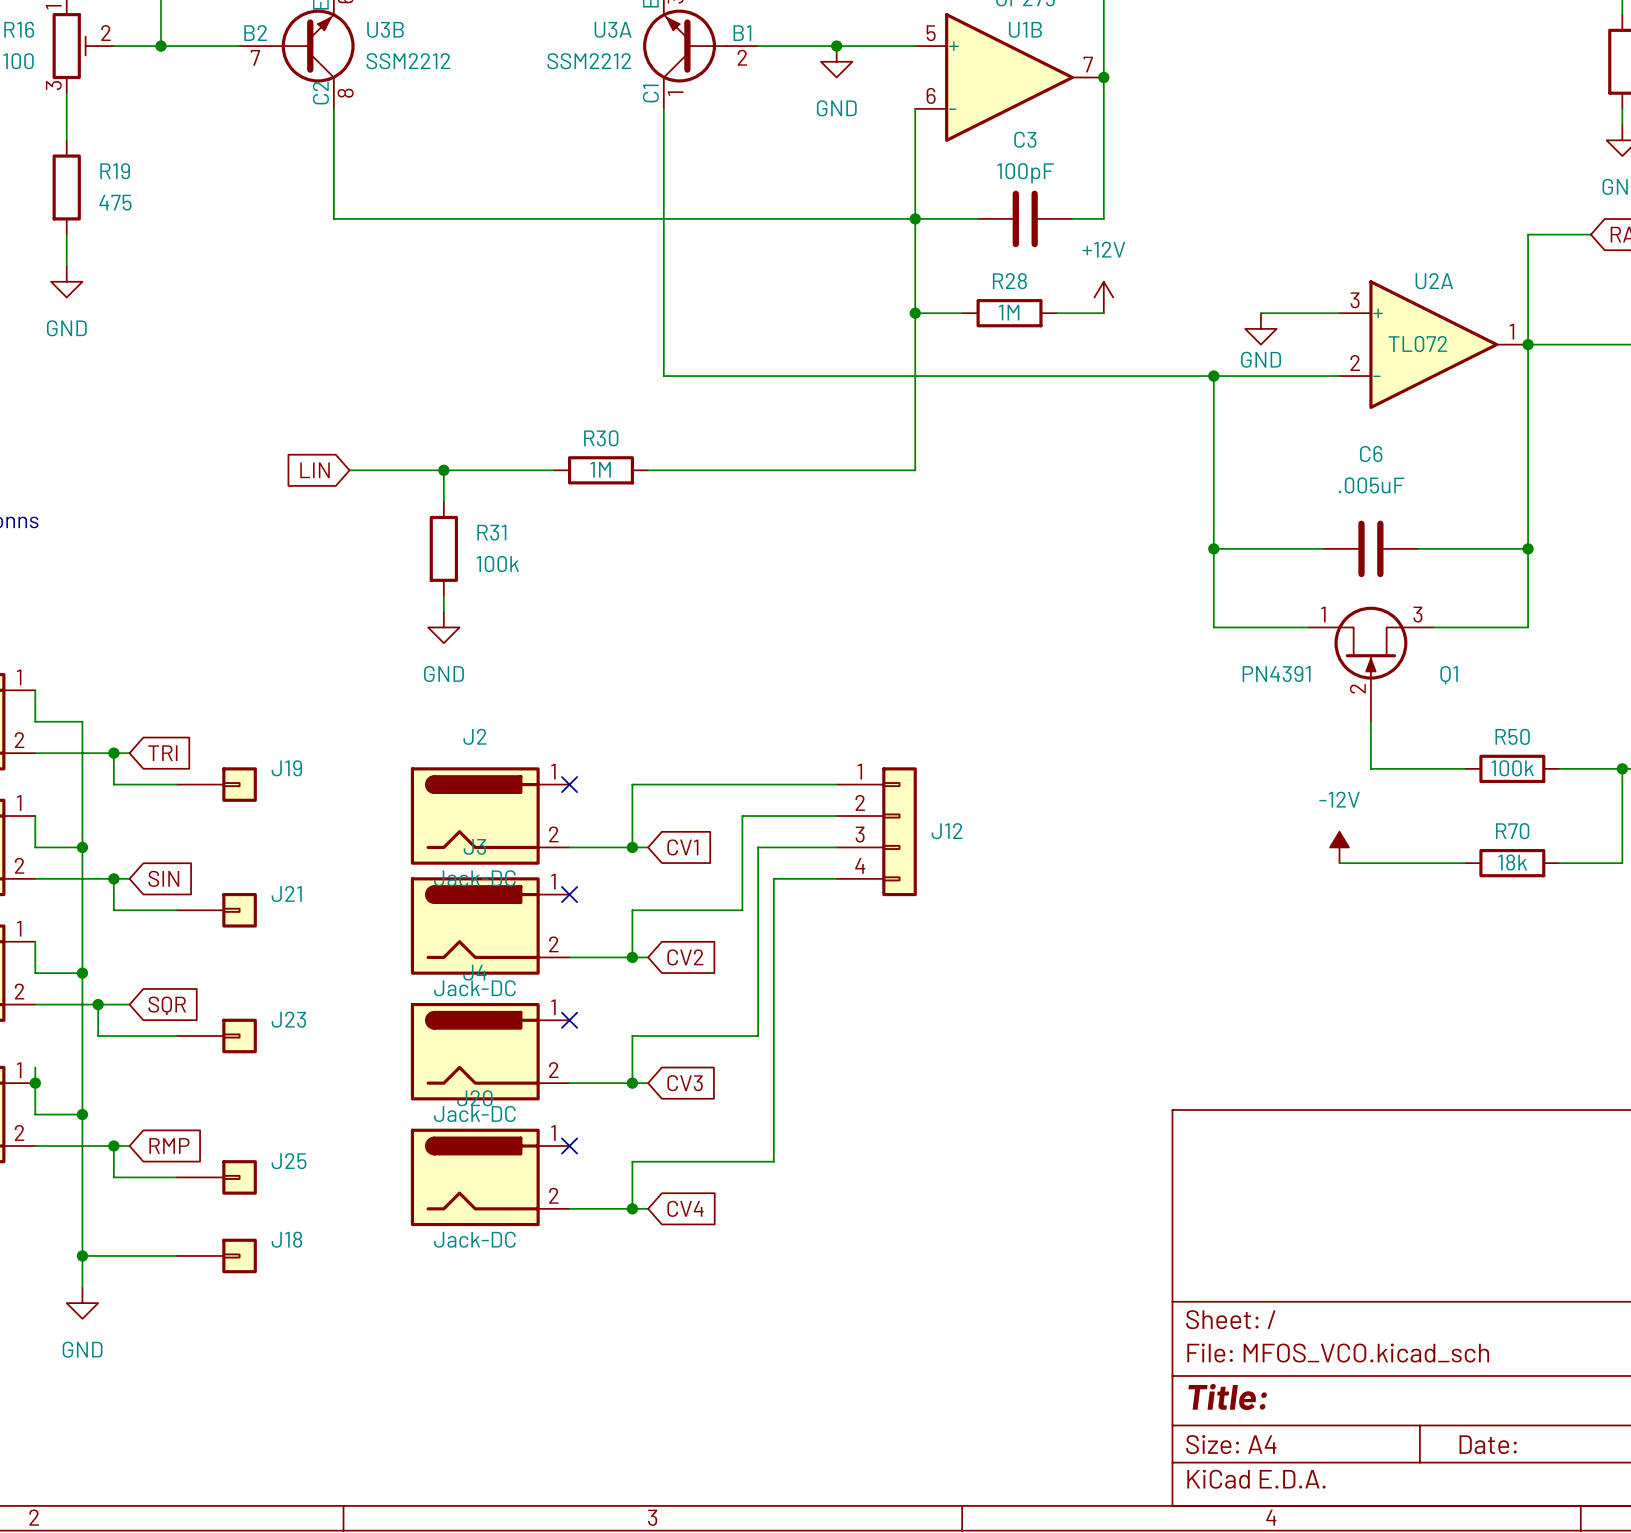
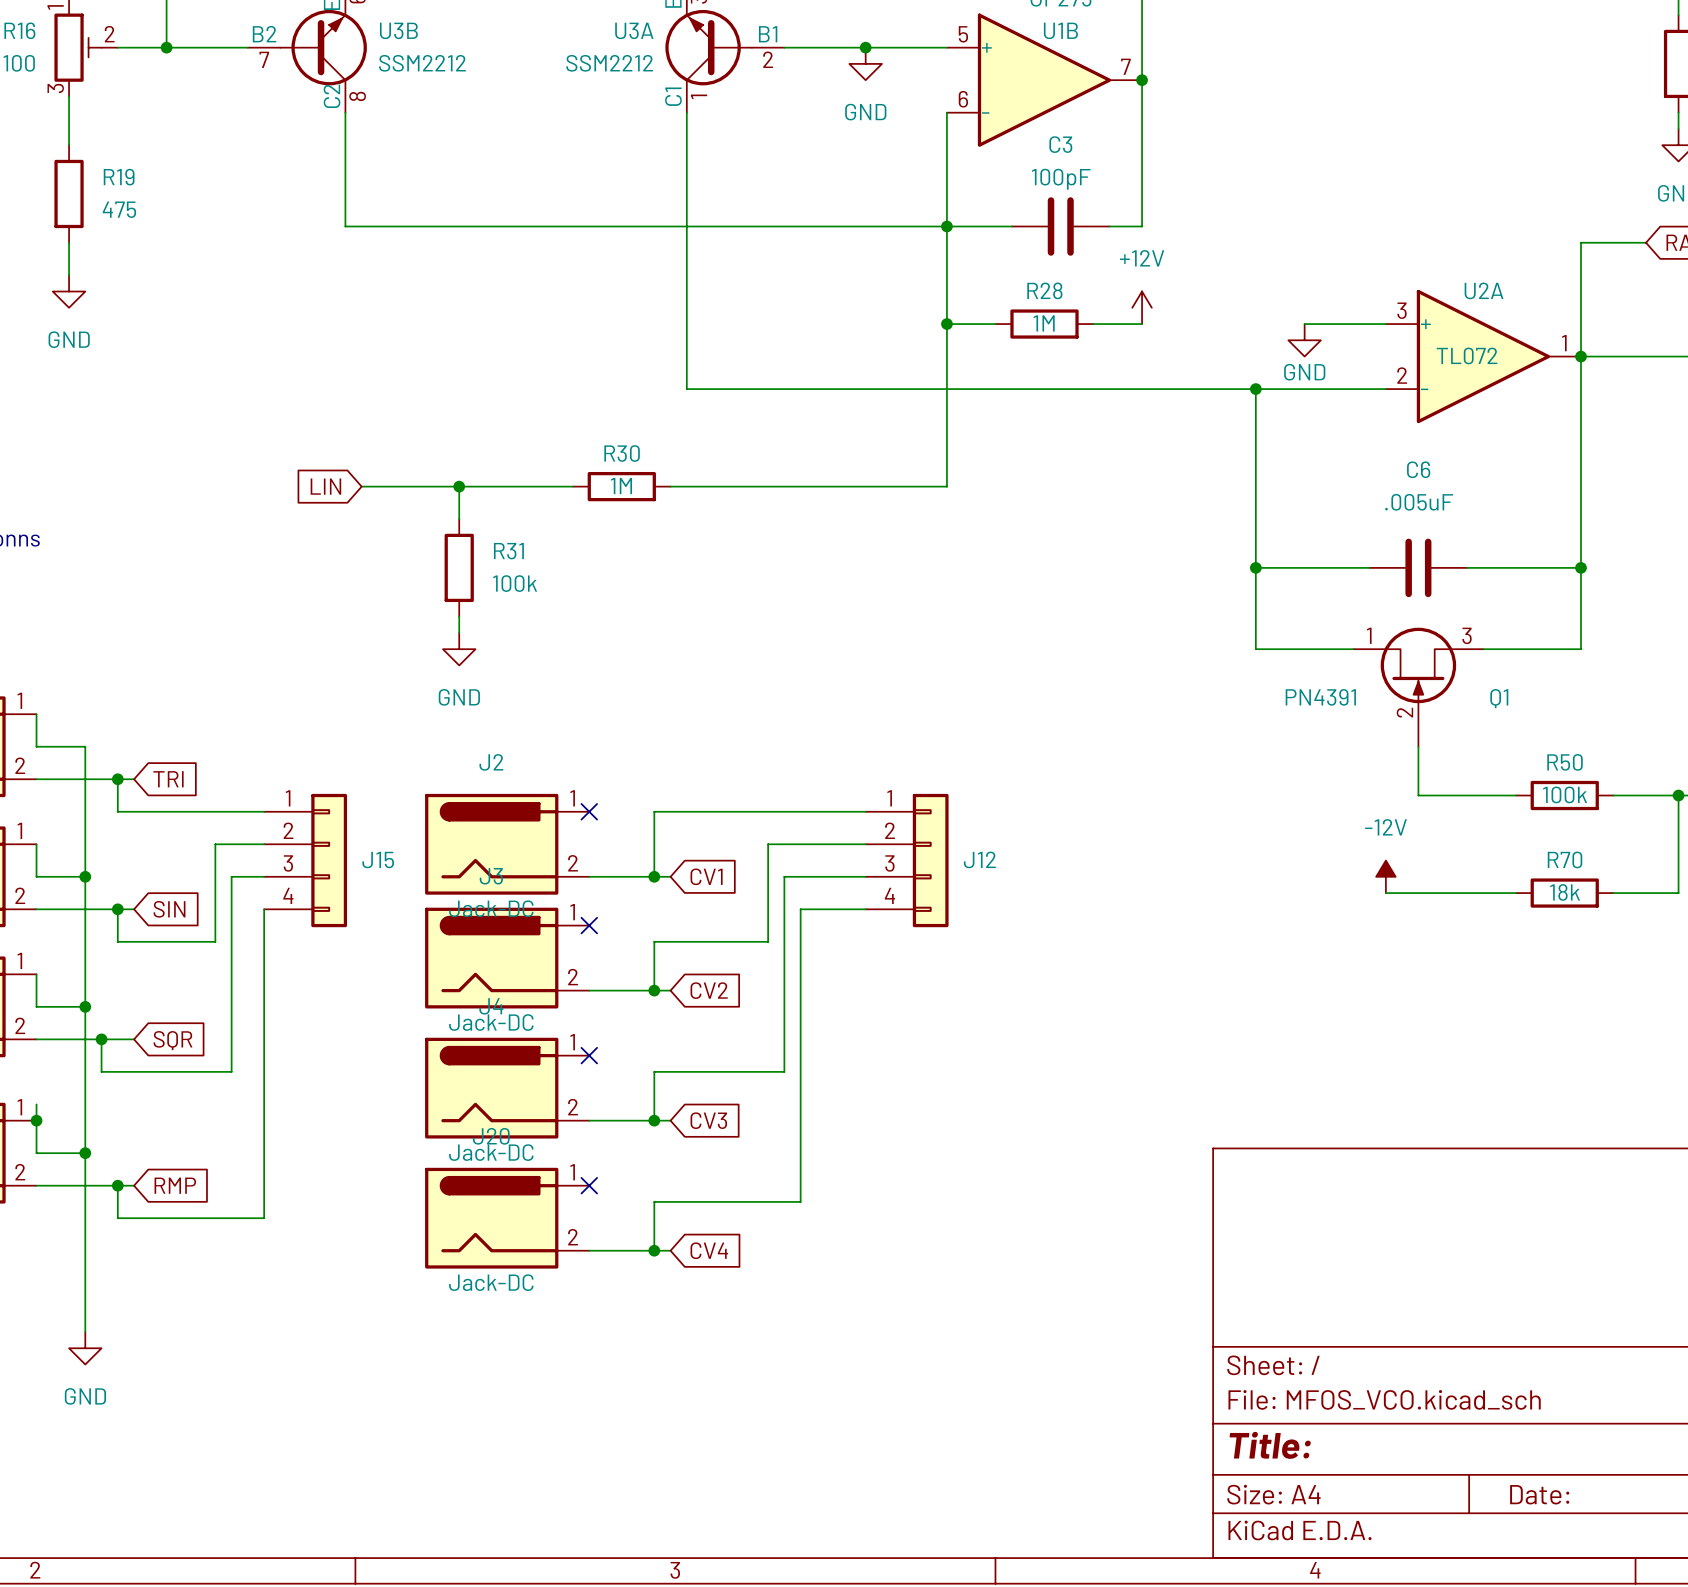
J19: (216, 784) -> none
wire: none -> (264, 844) (215, 844) (215, 941) (182, 941)
J15: none -> (305, 860)
wire: none -> (264, 876) (231, 876) (231, 1071) (182, 1071)
wire: none -> (264, 909) (264, 1218) (182, 1218)
J21: (216, 910) -> none
J23: (216, 1036) -> none
J25: (216, 1177) -> none
wire: (82, 1255) (176, 1255) -> none
junction: (82, 1255) -> none
J18: (216, 1255) -> none

